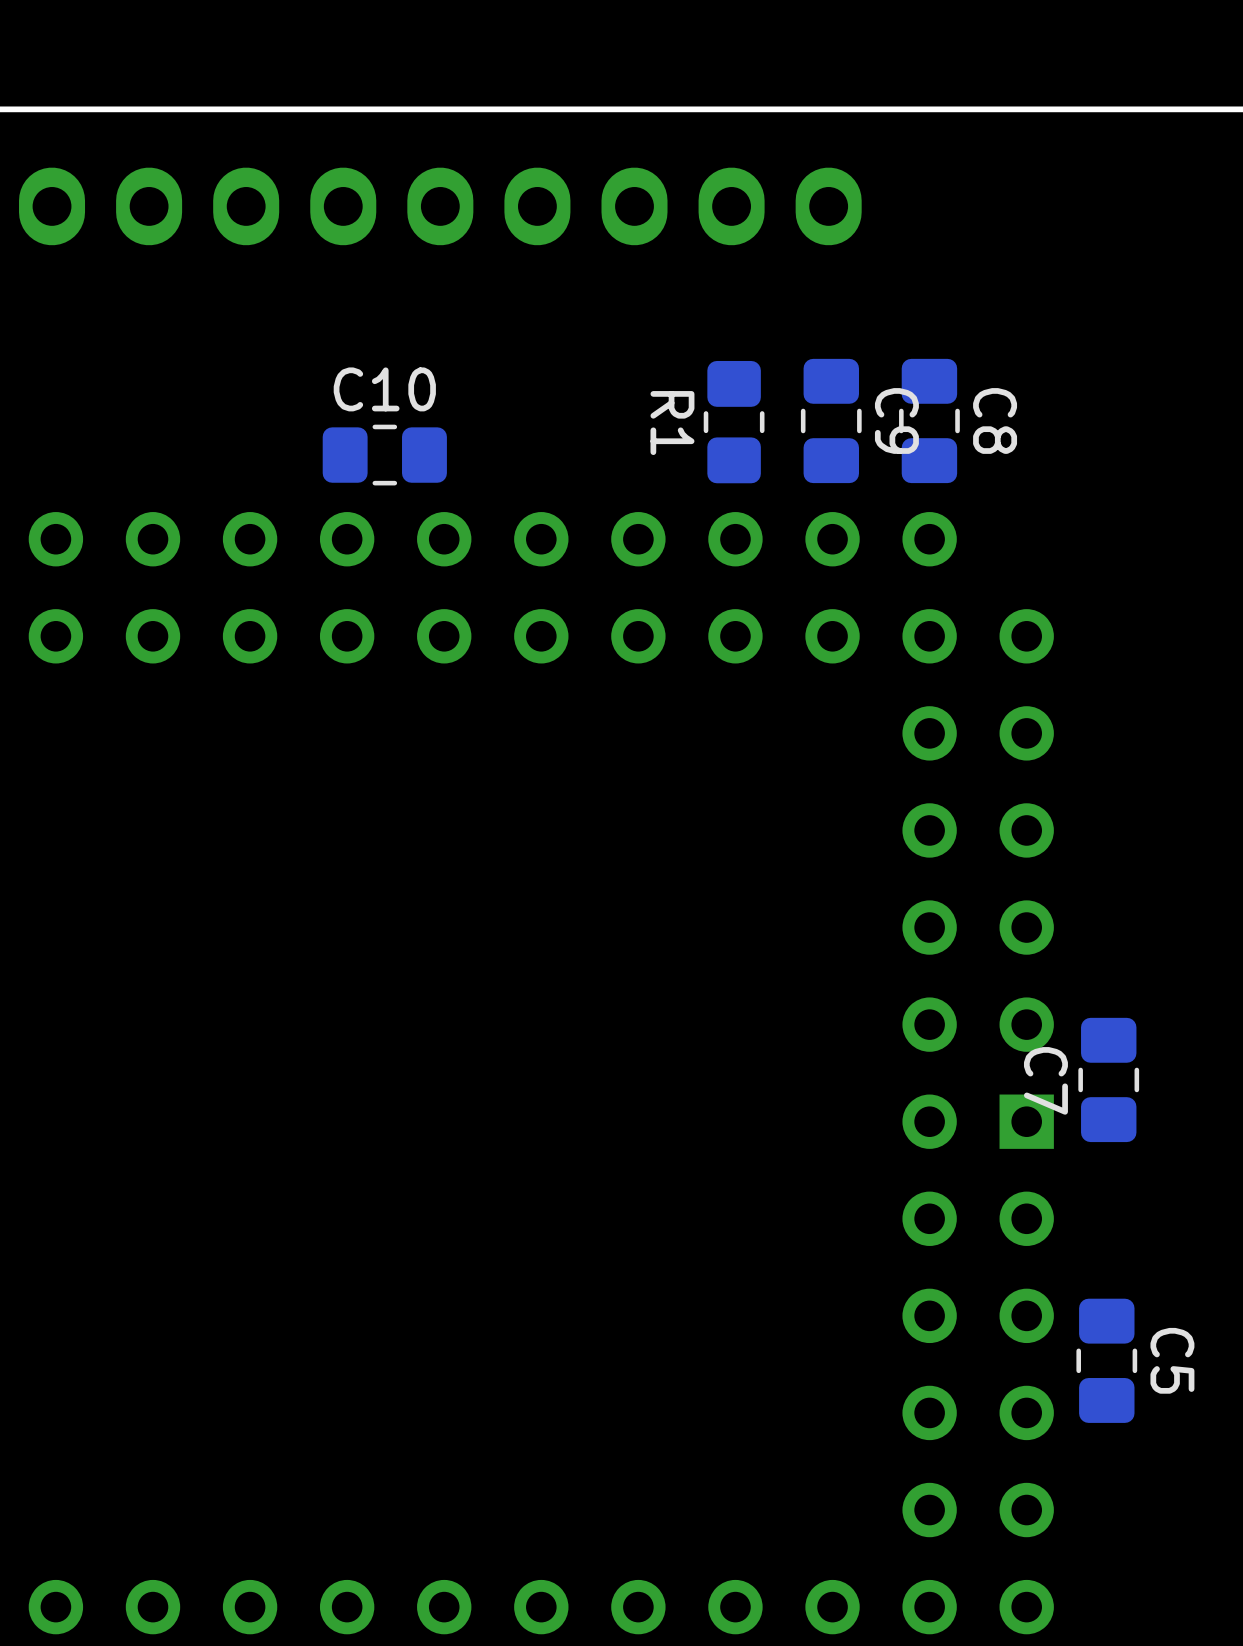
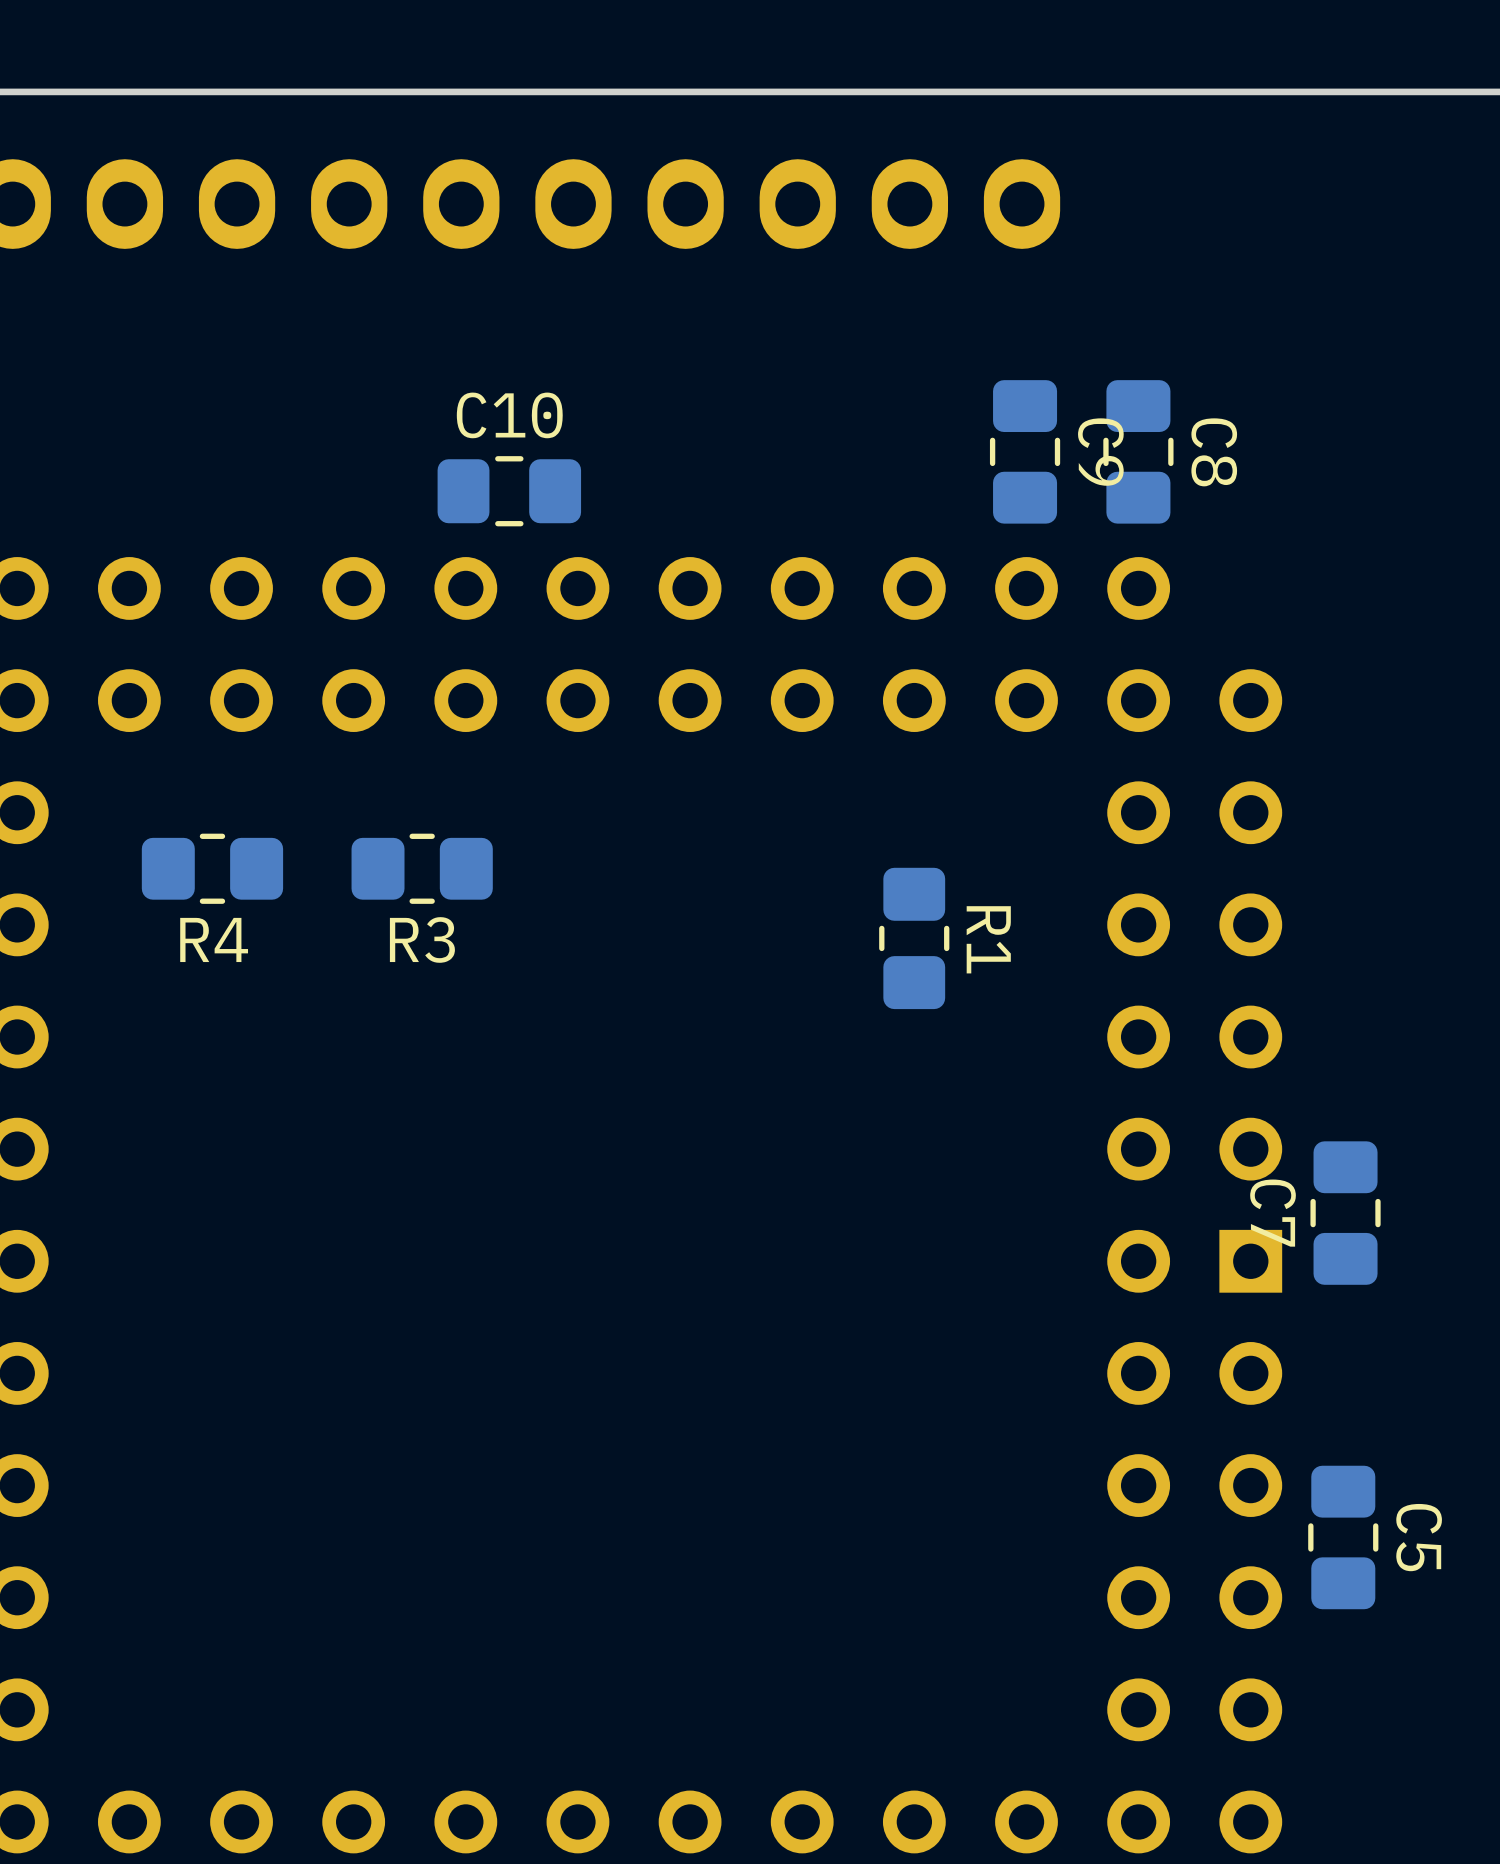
R1 position: (734, 422) -> (914, 938)
R1 name position: R1 (672, 423) -> R1 (988, 939)
R4: none -> (212, 868)
R3: none -> (422, 868)

